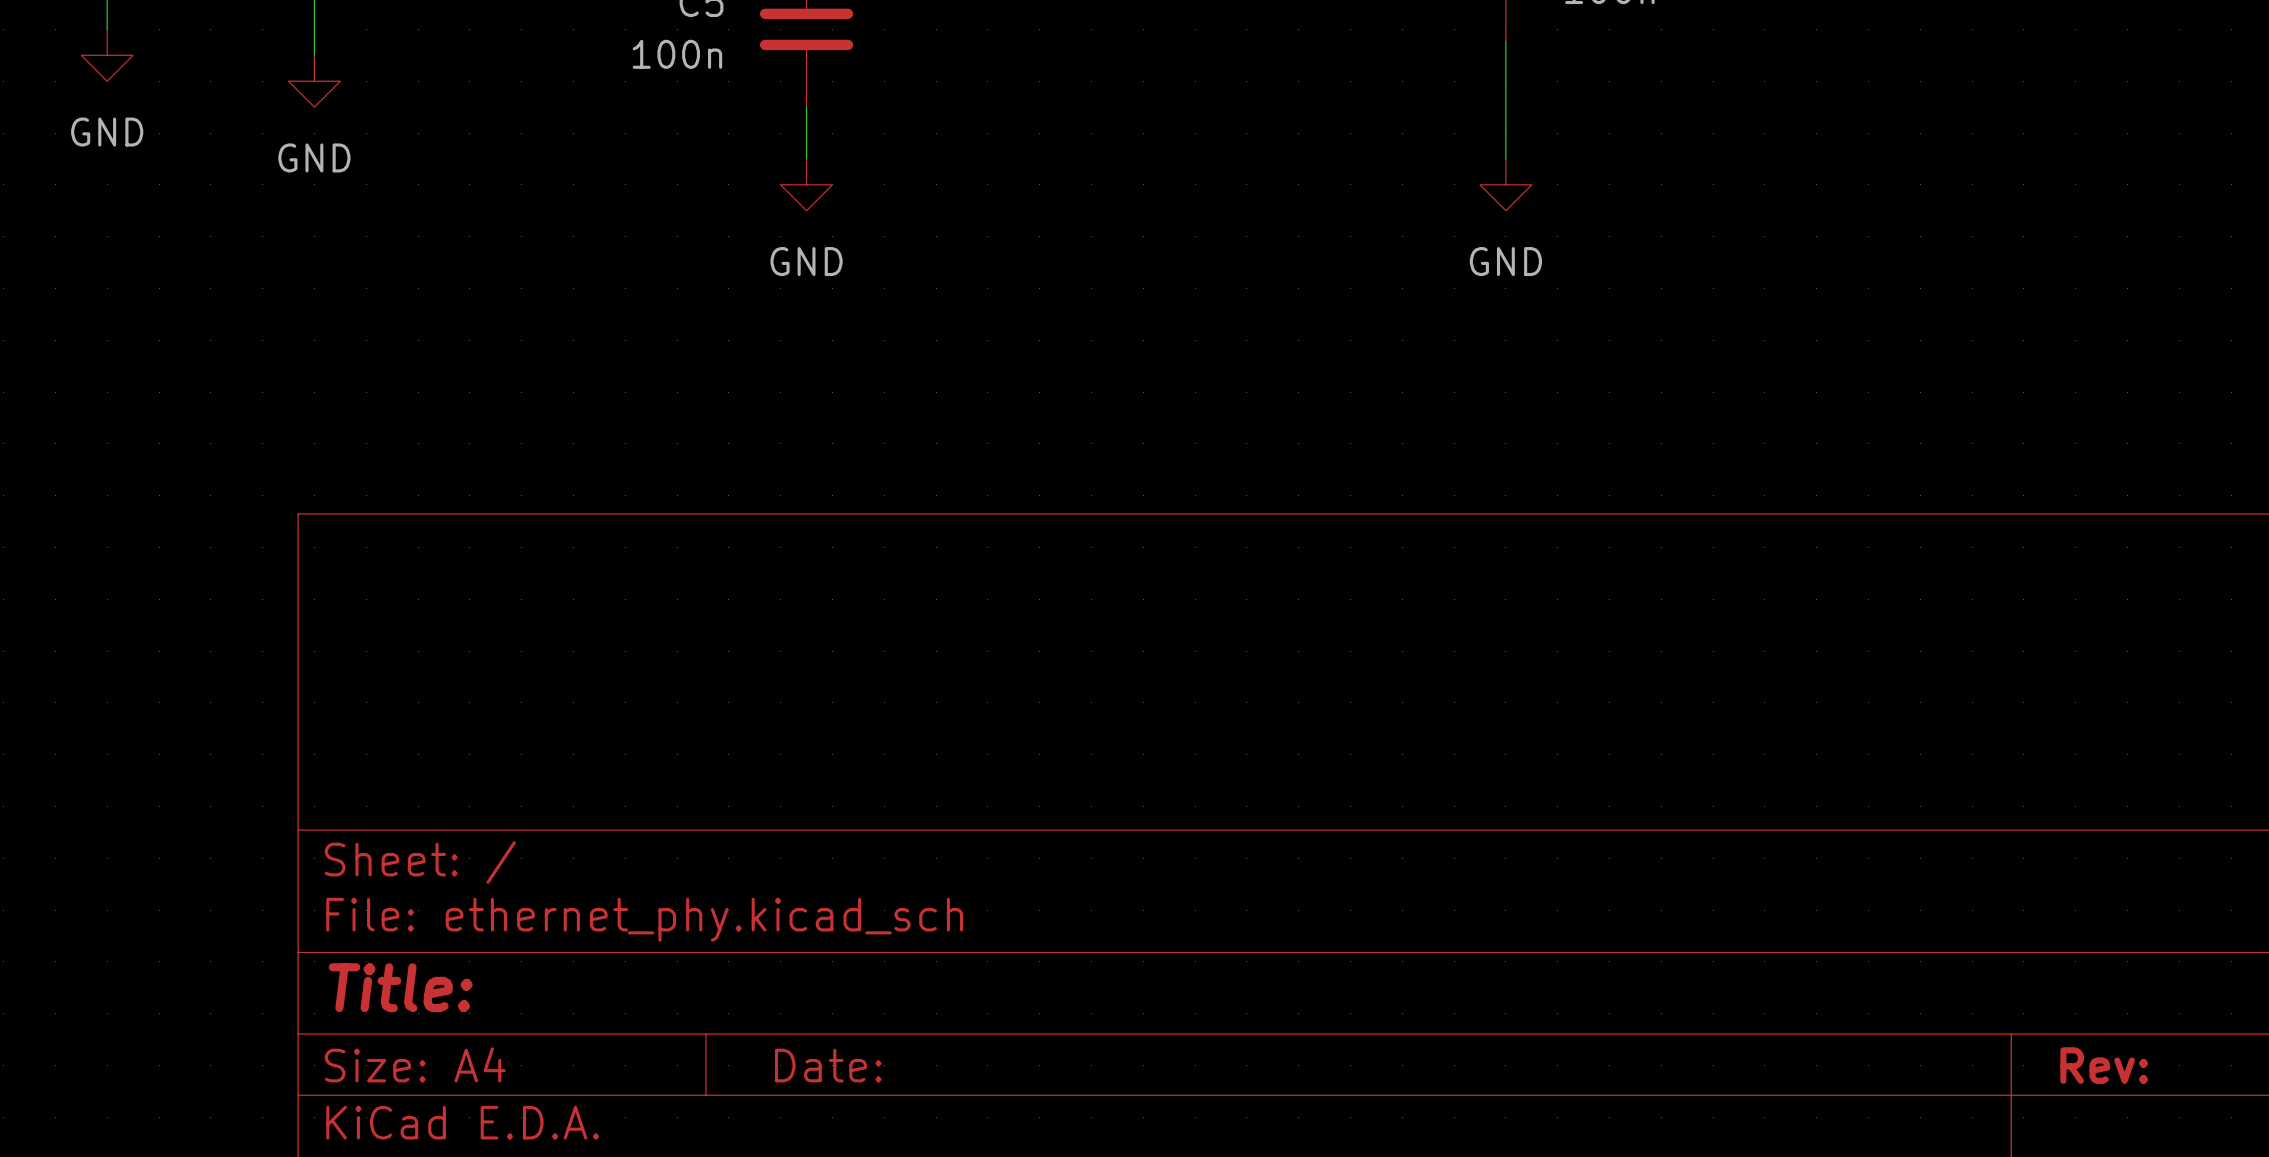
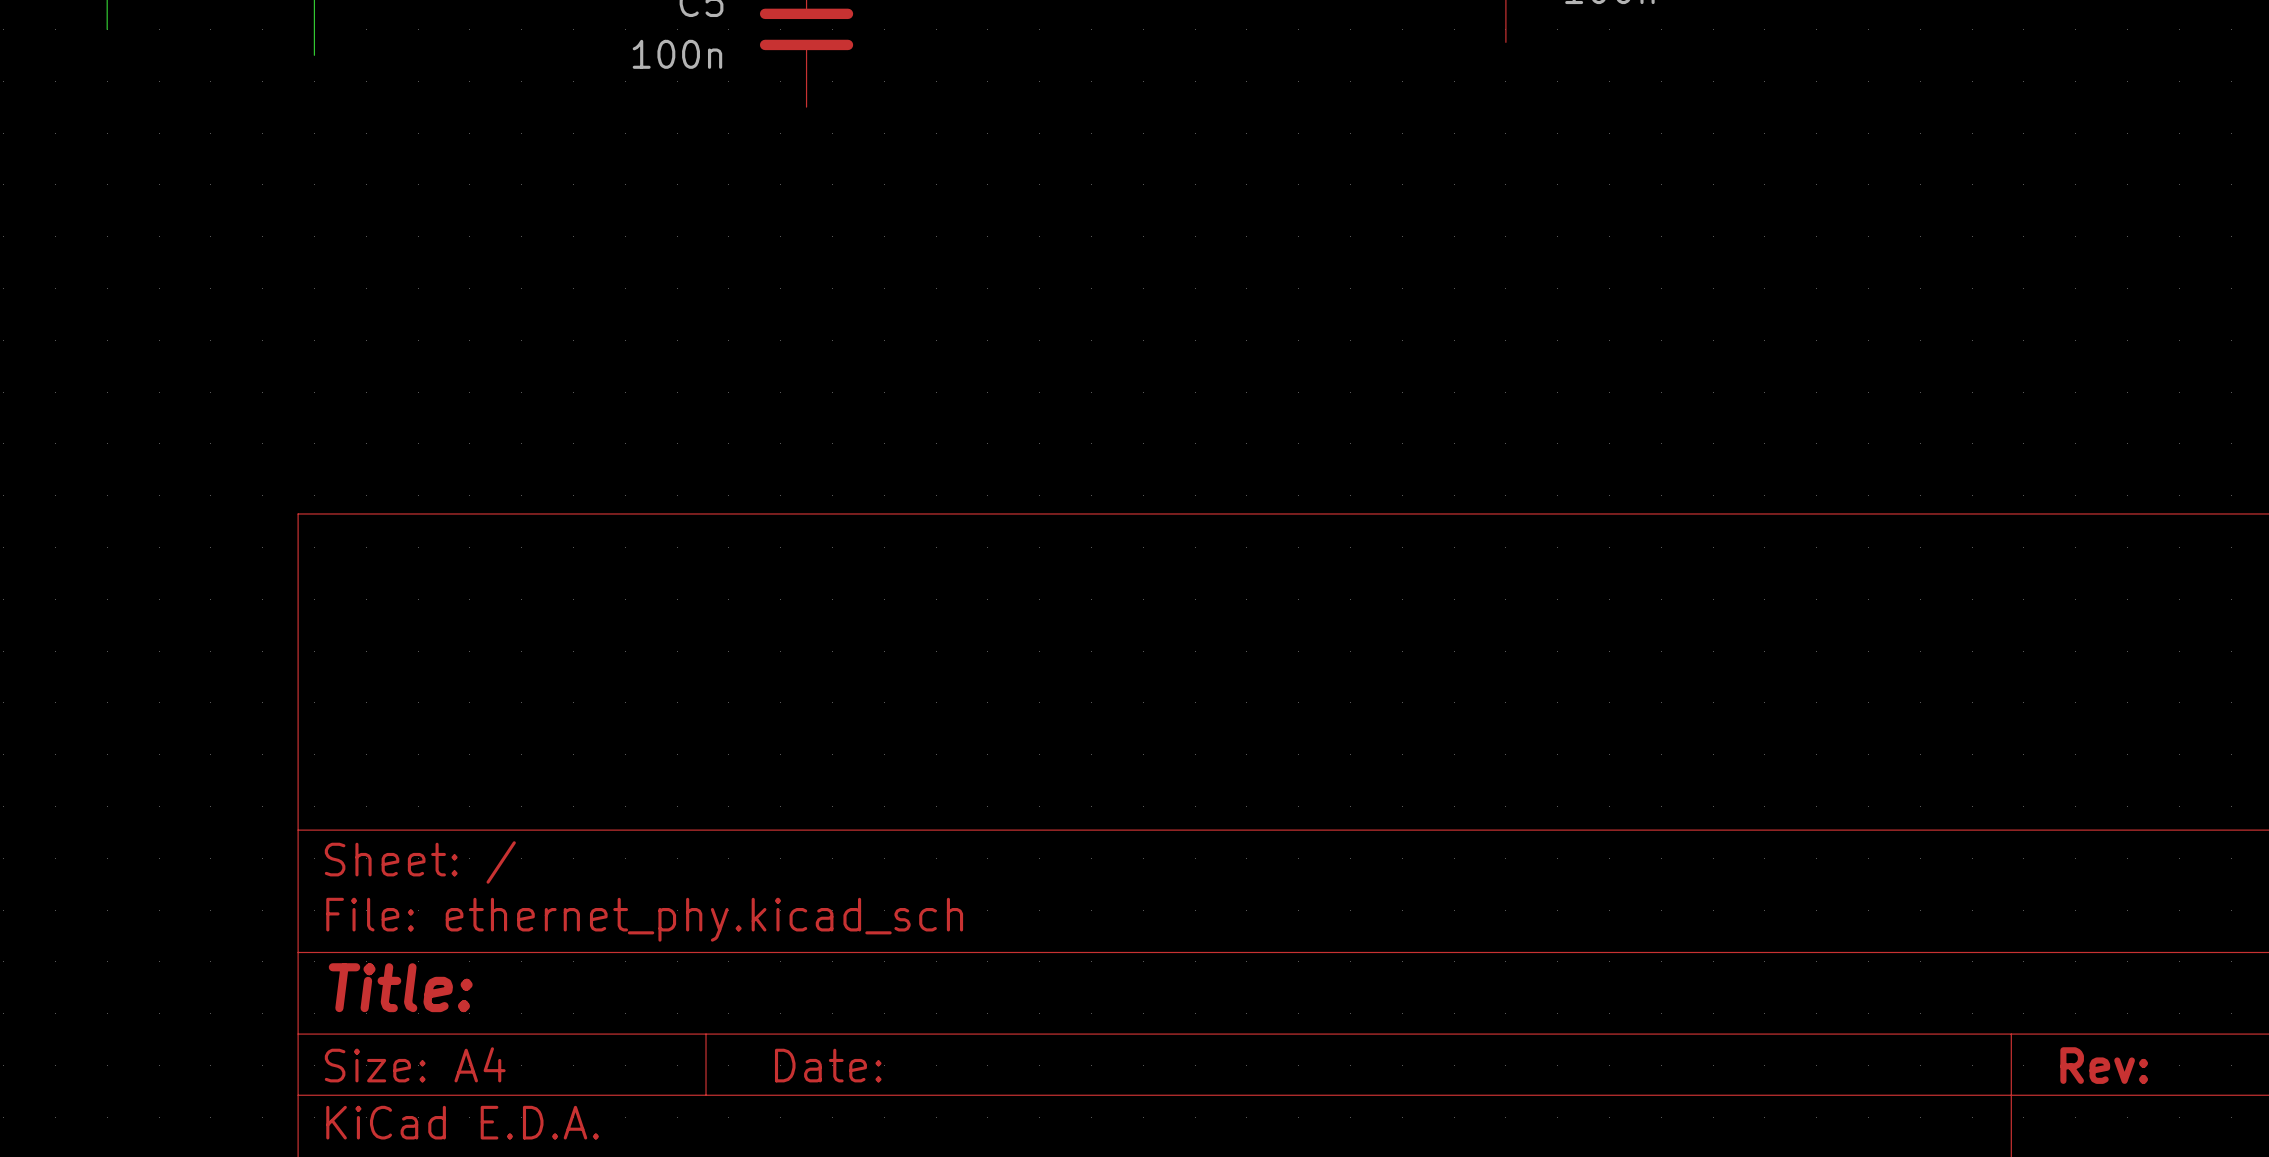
wire: (1505, 42) (1505, 158) -> none
power symbol: GND (107, 55) -> none
power symbol: GND (314, 81) -> none
wire: (806, 107) (806, 158) -> none
power symbol: GND (806, 184) -> none
power symbol: GND (1505, 184) -> none

